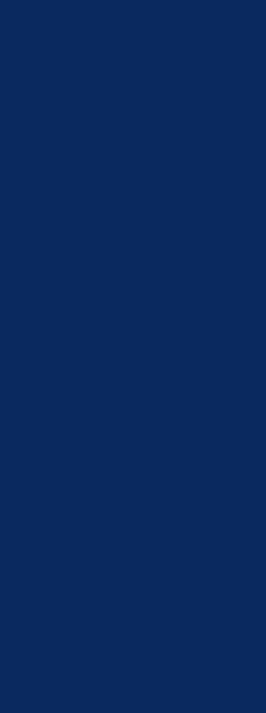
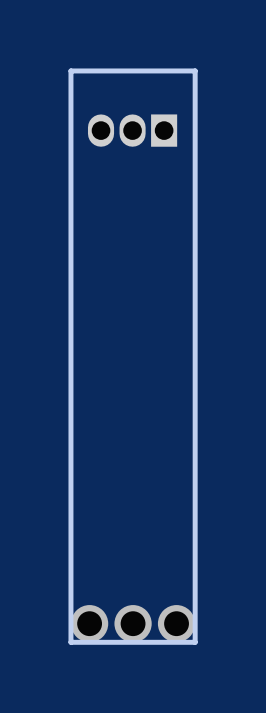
board edge: none -> (195, 70) (70, 70) (70, 642) (195, 642) (195, 70)
part: none -> (132, 130)
via: none -> (89, 623)
via: none -> (133, 623)
via: none -> (176, 623)

